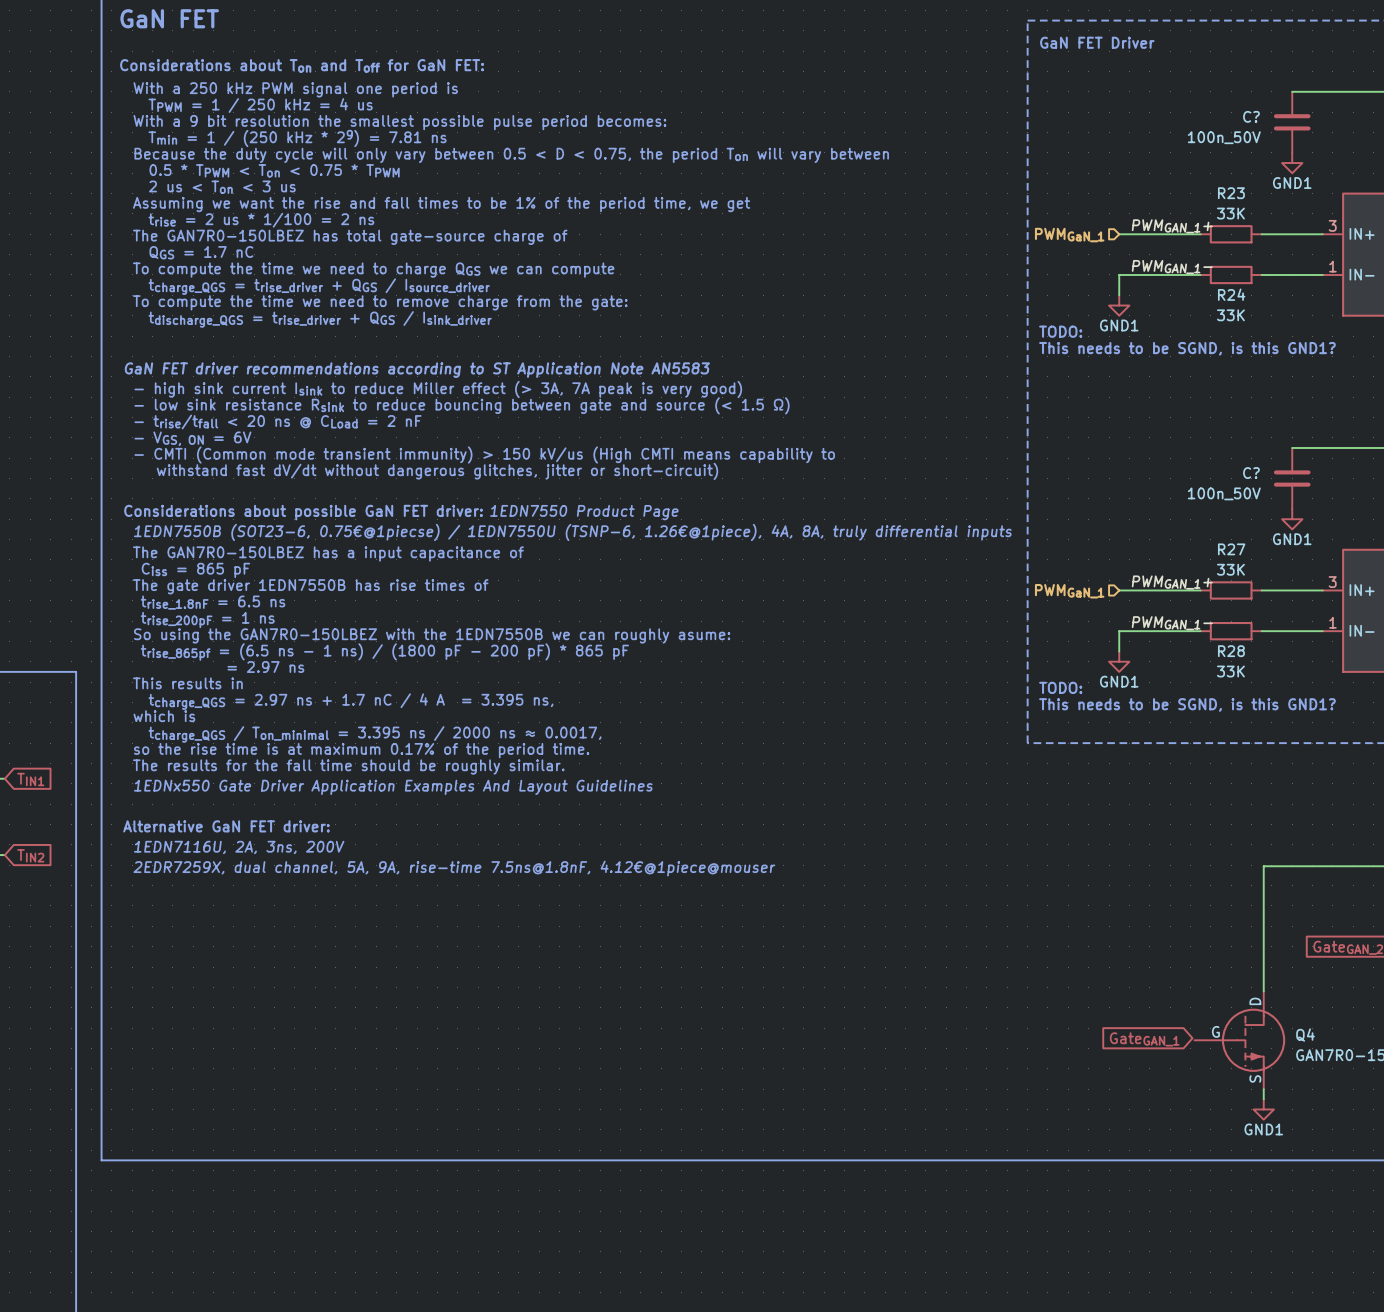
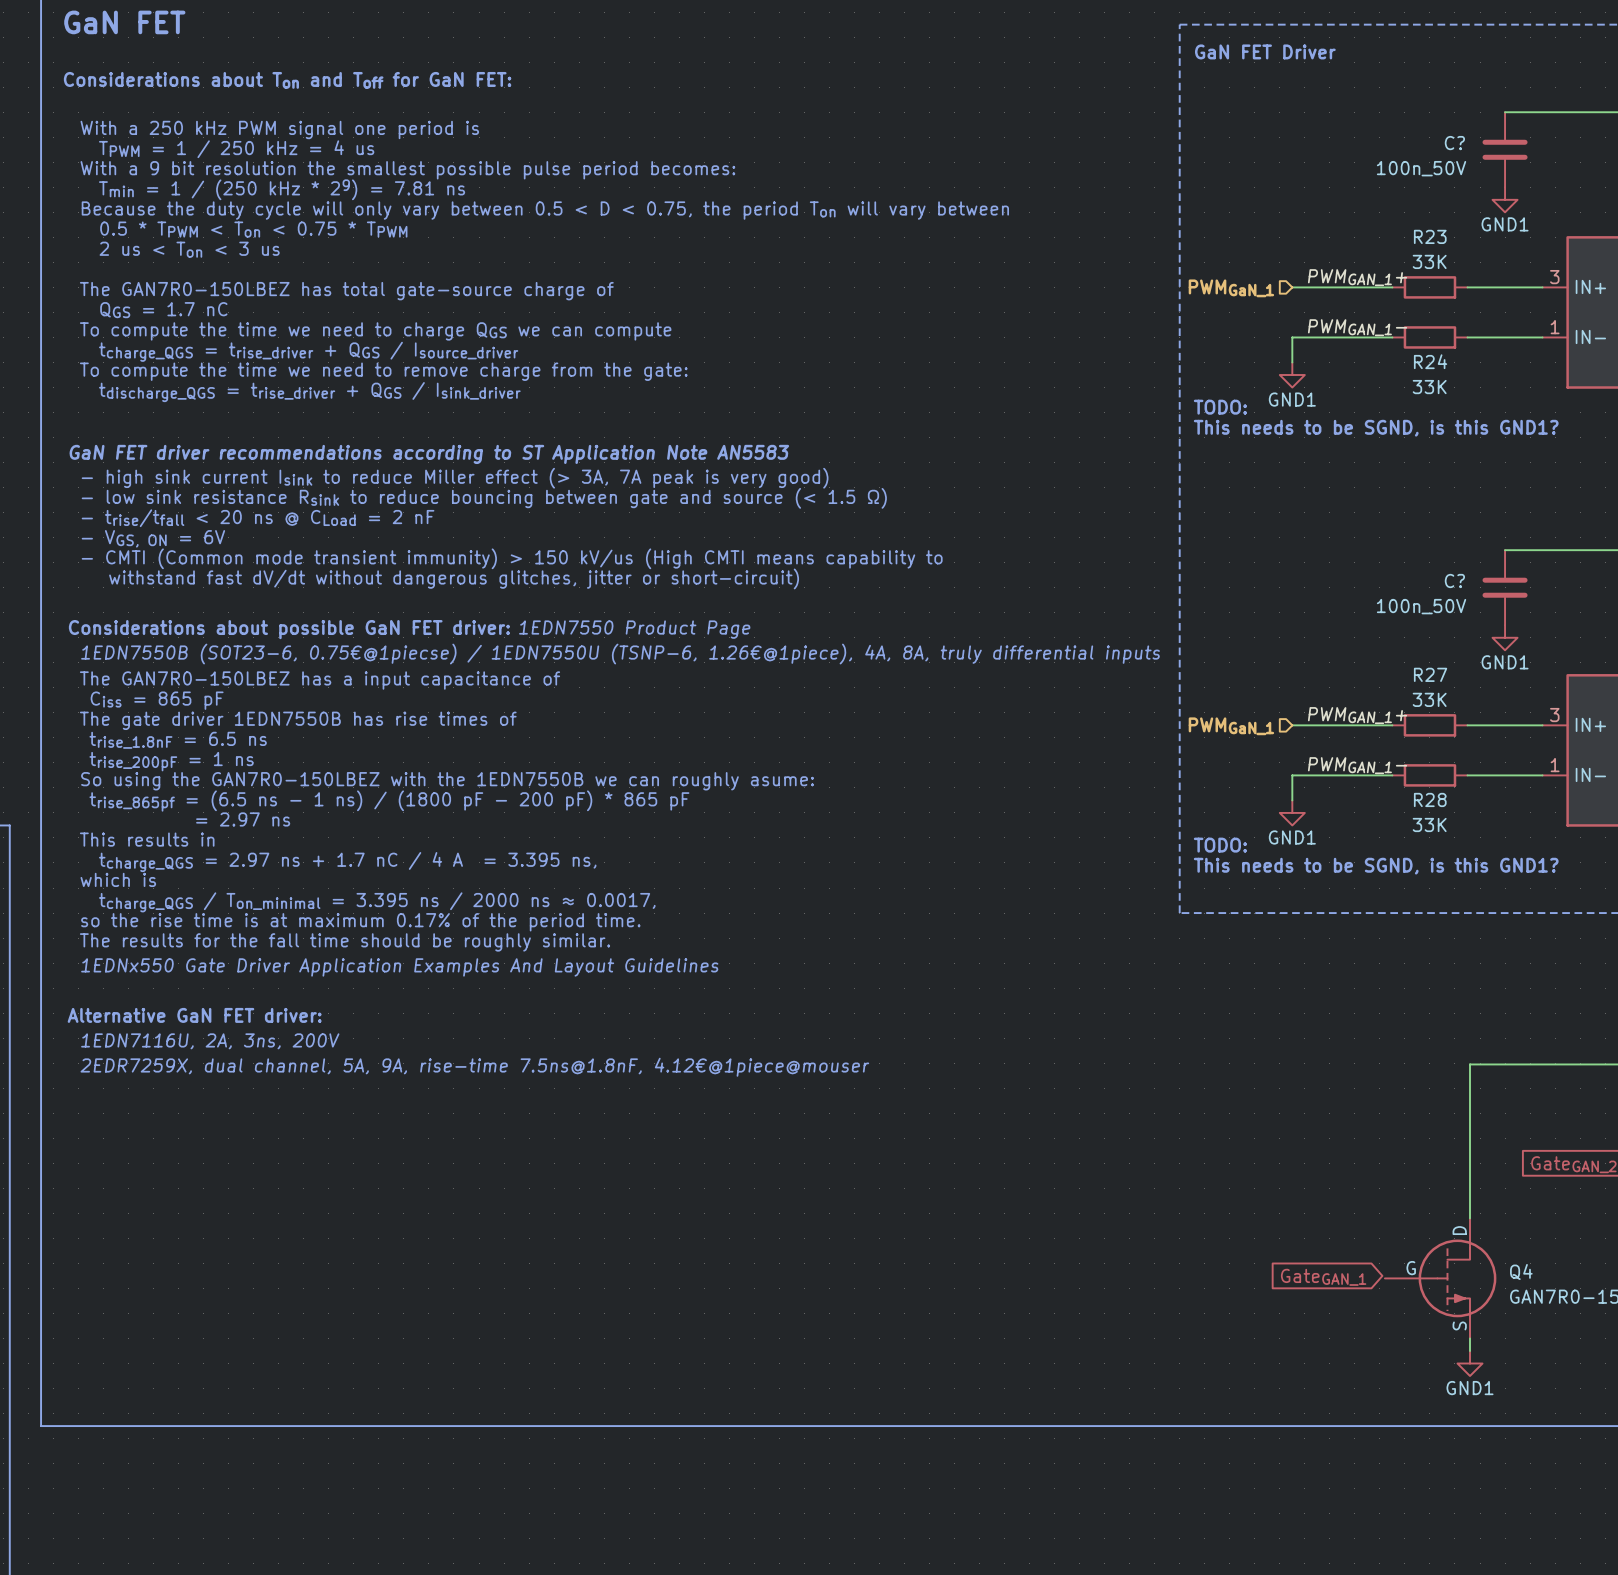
text: With a 250 kHz PWM signal one period is (295, 89) -> none
text: TPWM = 1 / 250 kHz = 4 us (260, 105) -> With a 250 kHz PWM signal one period is (279, 129)
text: With a 9 bit resolution the smallest possible pulse period becomes: (399, 122) -> TPWM = 1 / 250 kHz = 4 us (236, 149)
text: Tmin = 1 / (250 kHz * 29) = 7.81 ns (297, 138) -> With a 9 bit resolution the smallest possible pulse period becomes: (407, 170)
text: Because the duty cycle will only vary between 0.5 < D < 0.75, the period Ton will vary between (511, 155) -> Tmin = 1 / (250 kHz * 29) = 7.81 ns (282, 189)
text: 0.5 * TPWM < Ton < 0.75 * TPWM (274, 170) -> Because the duty cycle will only vary between 0.5 < D < 0.75, the period Ton will vary between (545, 210)
text: 2 us < Ton < 3 us (222, 187) -> 0.5 * TPWM < Ton < 0.75 * TPWM (253, 229)
text: Assuming we want the rise and fall times to be 1% of the period time, we get (441, 204) -> 2 us < Ton < 3 us (189, 249)
text: trise = 2 us * 1/100 = 2 ns (261, 220) -> none

